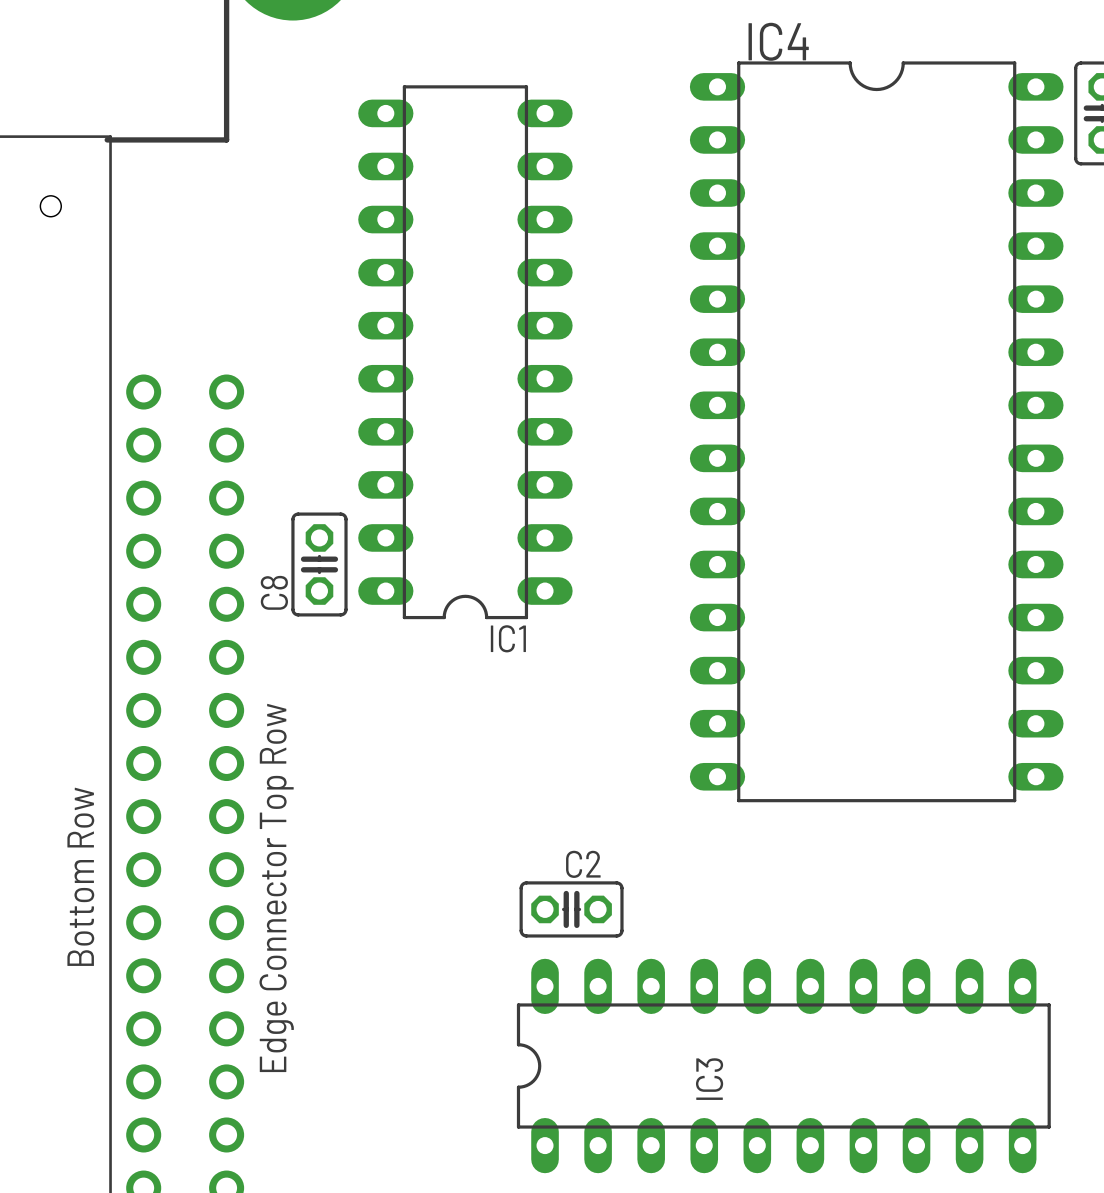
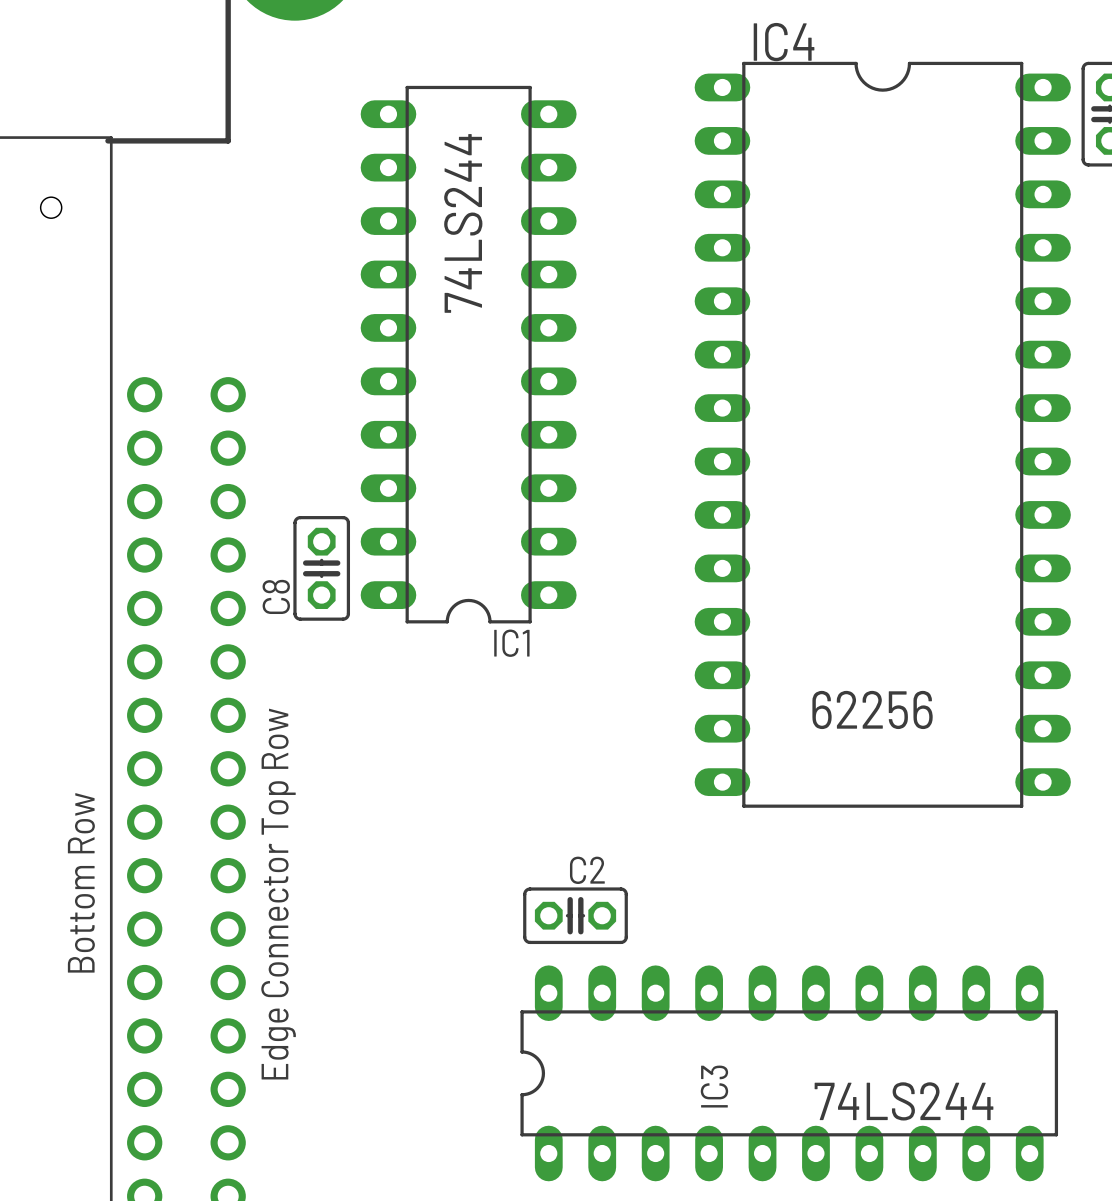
text: none -> 74LS244 (463, 223)
text: none -> 62256 (872, 709)
text: none -> 74LS244 (903, 1101)

